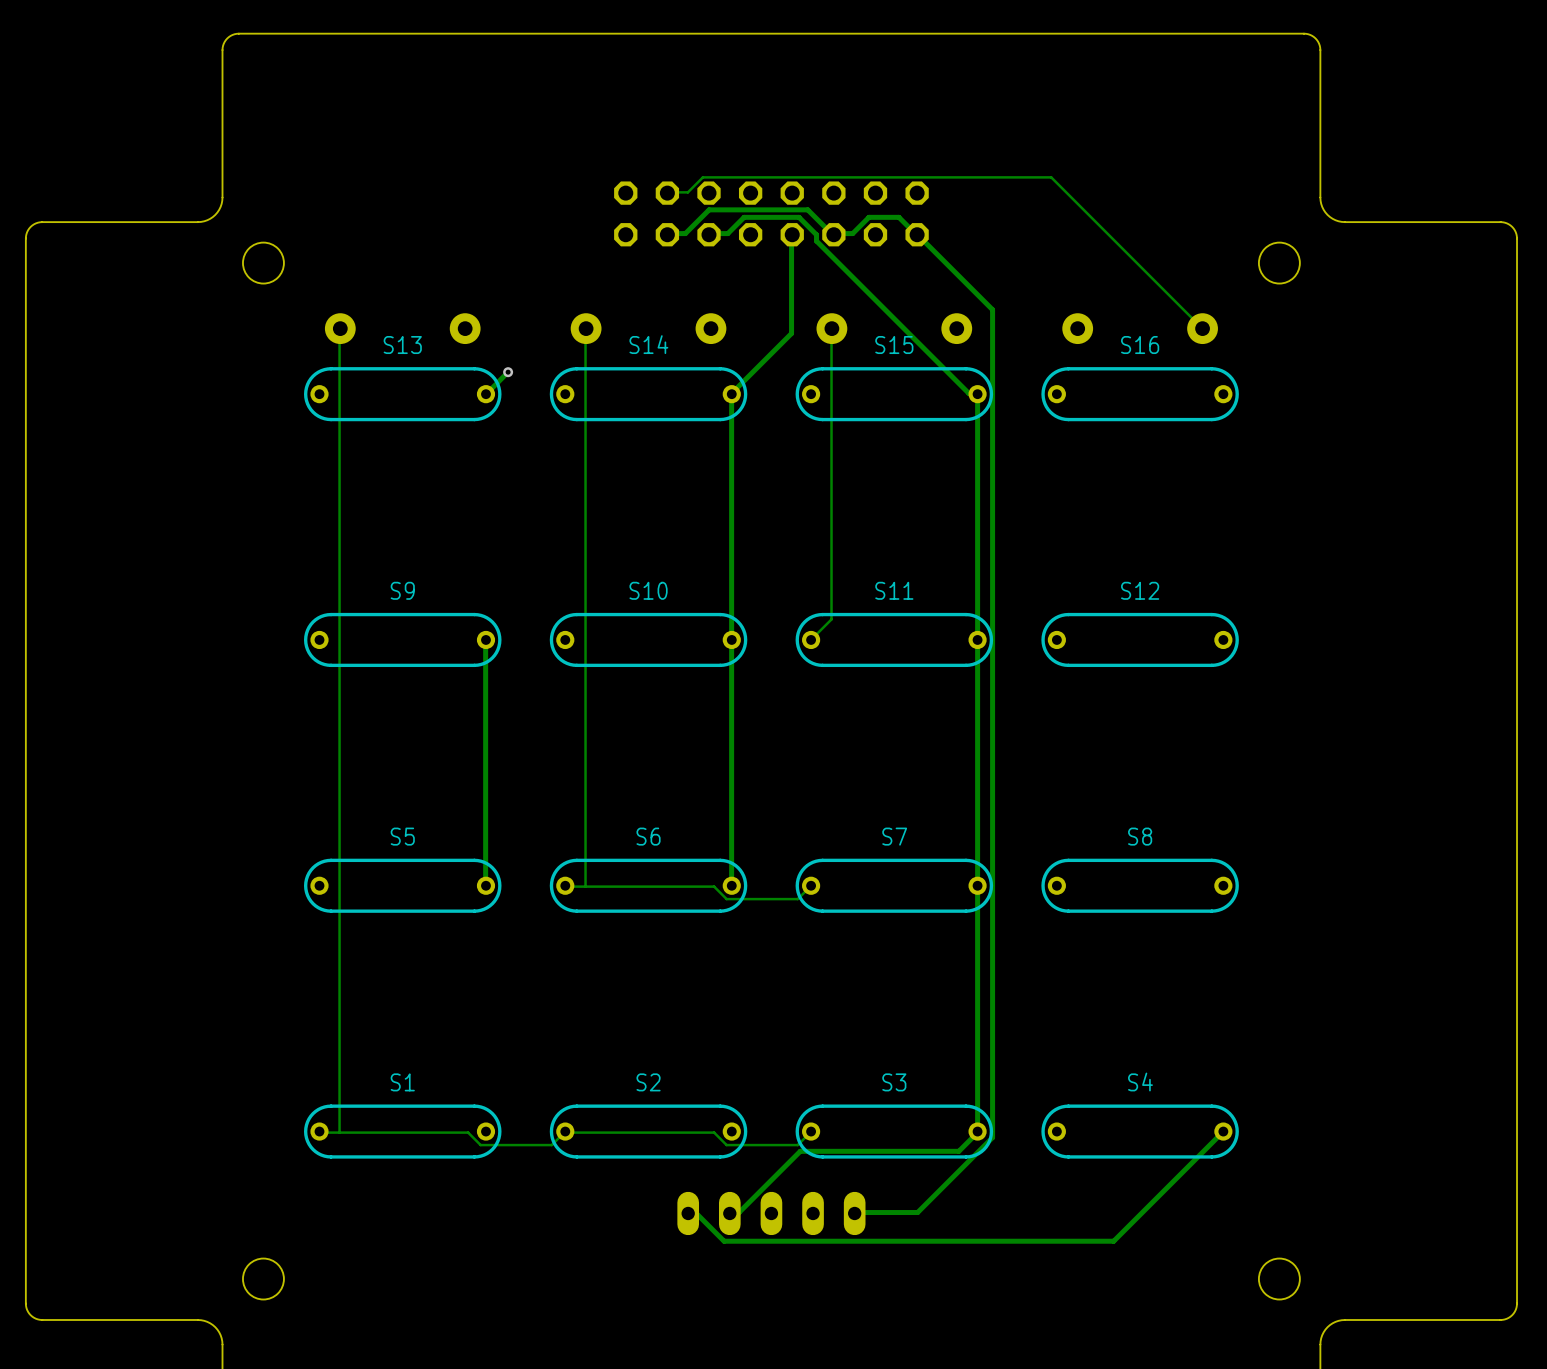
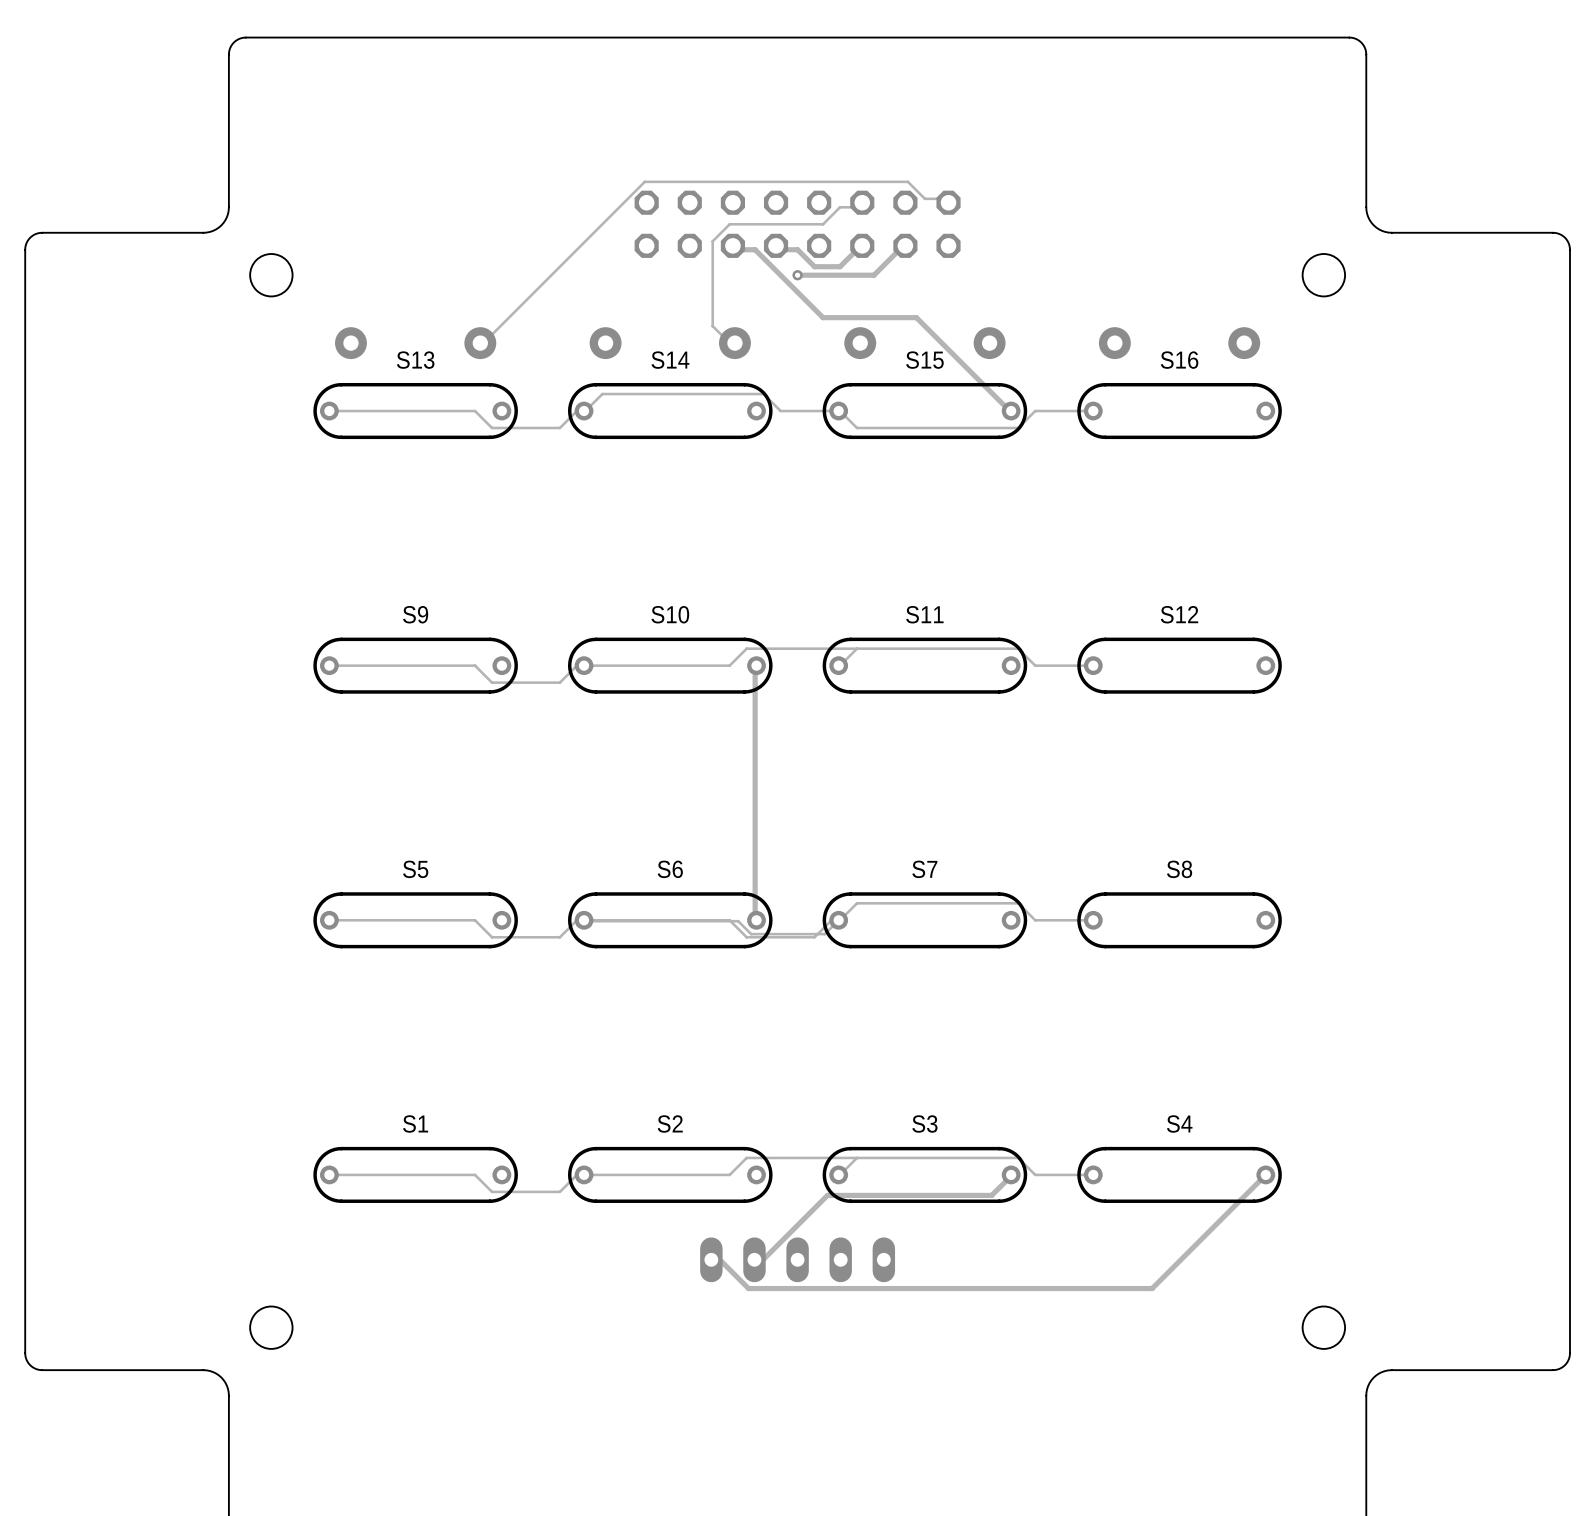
track: (667, 193) (687, 192) (702, 177) (1051, 177) (1202, 328) -> none
track: none -> (862, 202) (857, 207) (840, 207) (823, 224) (729, 224) (712, 241) (712, 326) (729, 343) (734, 343)
track: none -> (948, 202) (941, 198) (924, 198) (907, 181) (644, 181) (483, 343) (480, 343)
track: (667, 234) (685, 233) (709, 209) (807, 209) (833, 234) (852, 233) (868, 217) (898, 217) (992, 309) (992, 1137) (917, 1212) (854, 1213) -> none
track: (709, 234) (727, 233) (744, 217) (799, 217) (816, 234) (816, 241) (968, 393) (977, 394) (977, 1131) -> (732, 245) (738, 249) (755, 249) (823, 317) (916, 317) (1011, 411)
track: (792, 234) (791, 333) (731, 394) (731, 885) -> (756, 665) (756, 920)
track: none -> (862, 245) (840, 266) (814, 266) (797, 249) (780, 249) (776, 245)
track: none -> (905, 245) (873, 275) (797, 275)
via: none -> (797, 275)
track: (340, 328) (339, 1132) -> none
track: (586, 328) (585, 886) -> none
track: (831, 328) (831, 619) (811, 639) -> (857, 648) (838, 665)
track: (508, 372) (485, 394) -> none
via: (508, 372) -> none
track: none -> (1093, 411) (1035, 411) (1018, 428) (857, 428) (840, 411) (780, 411) (763, 394) (602, 394) (585, 411) (576, 411) (559, 428) (492, 428) (475, 411) (329, 411)
track: (485, 639) (485, 885) -> none
track: none -> (1093, 665) (1035, 665) (1018, 648) (746, 648) (729, 665) (576, 665) (559, 682) (492, 682) (475, 665) (329, 665)
track: none -> (1093, 920) (1035, 920) (1018, 903) (857, 903) (840, 920) (831, 920) (814, 937) (746, 937) (729, 920) (576, 920) (559, 937) (492, 937) (475, 920) (329, 920)
track: none -> (857, 1157) (838, 1174)
track: (811, 1131) (797, 1145) (726, 1145) (714, 1132) (565, 1131) (551, 1145) (480, 1145) (468, 1132) (319, 1131) -> (1093, 1174) (1035, 1174) (1018, 1157) (746, 1157) (729, 1174) (576, 1174) (559, 1191) (492, 1191) (475, 1174) (329, 1174)

